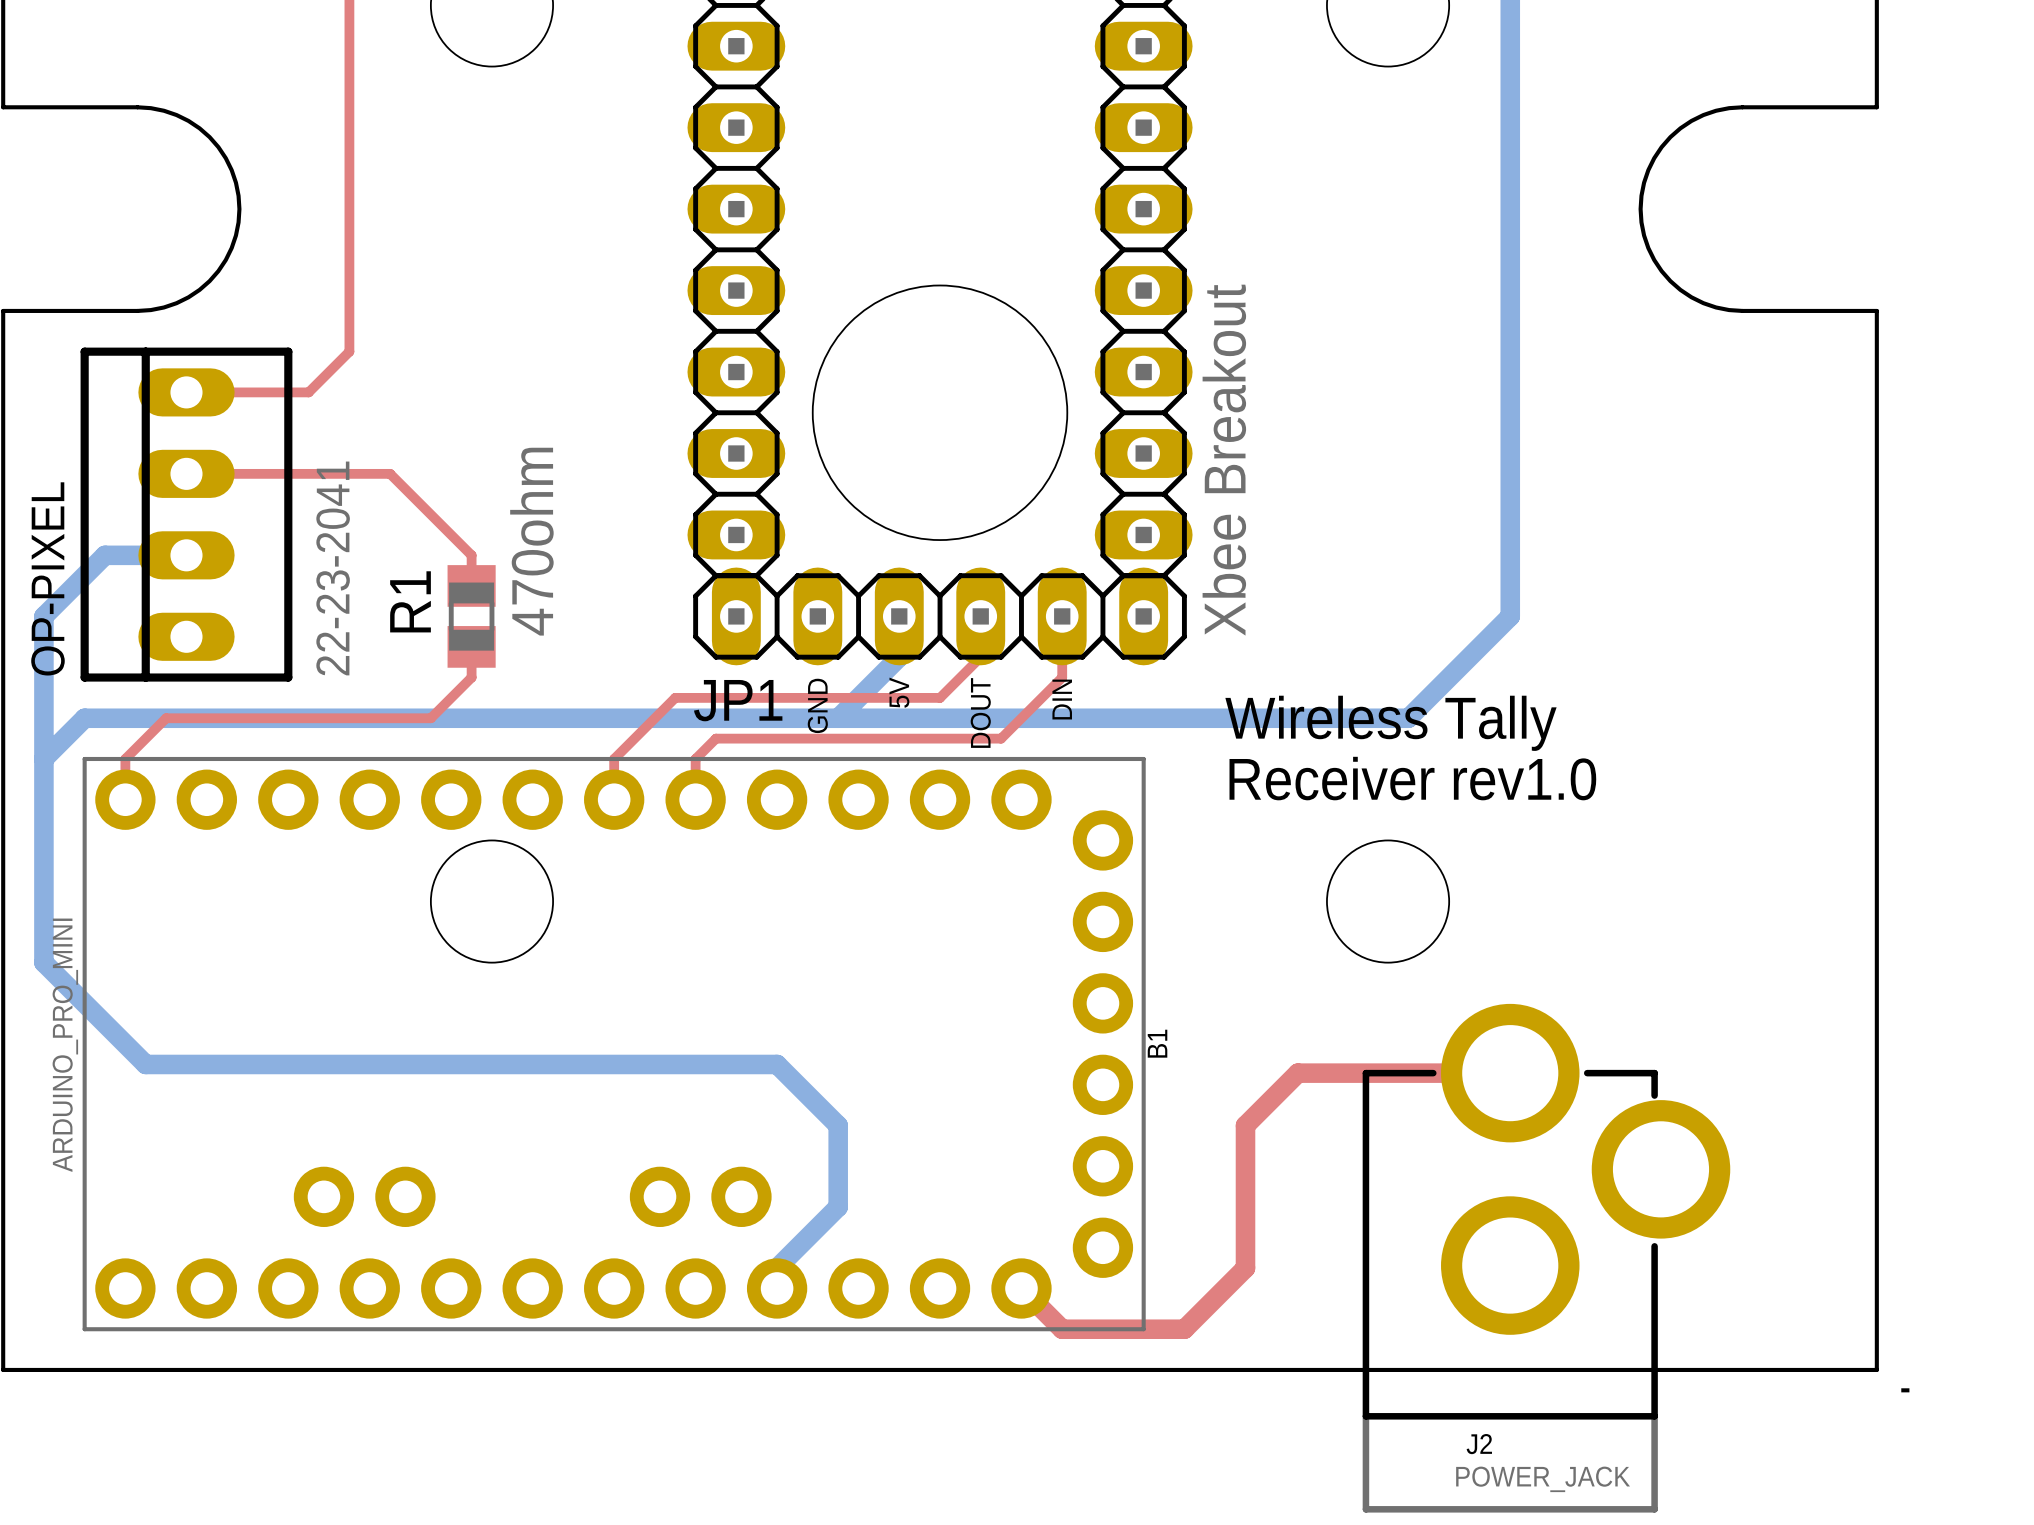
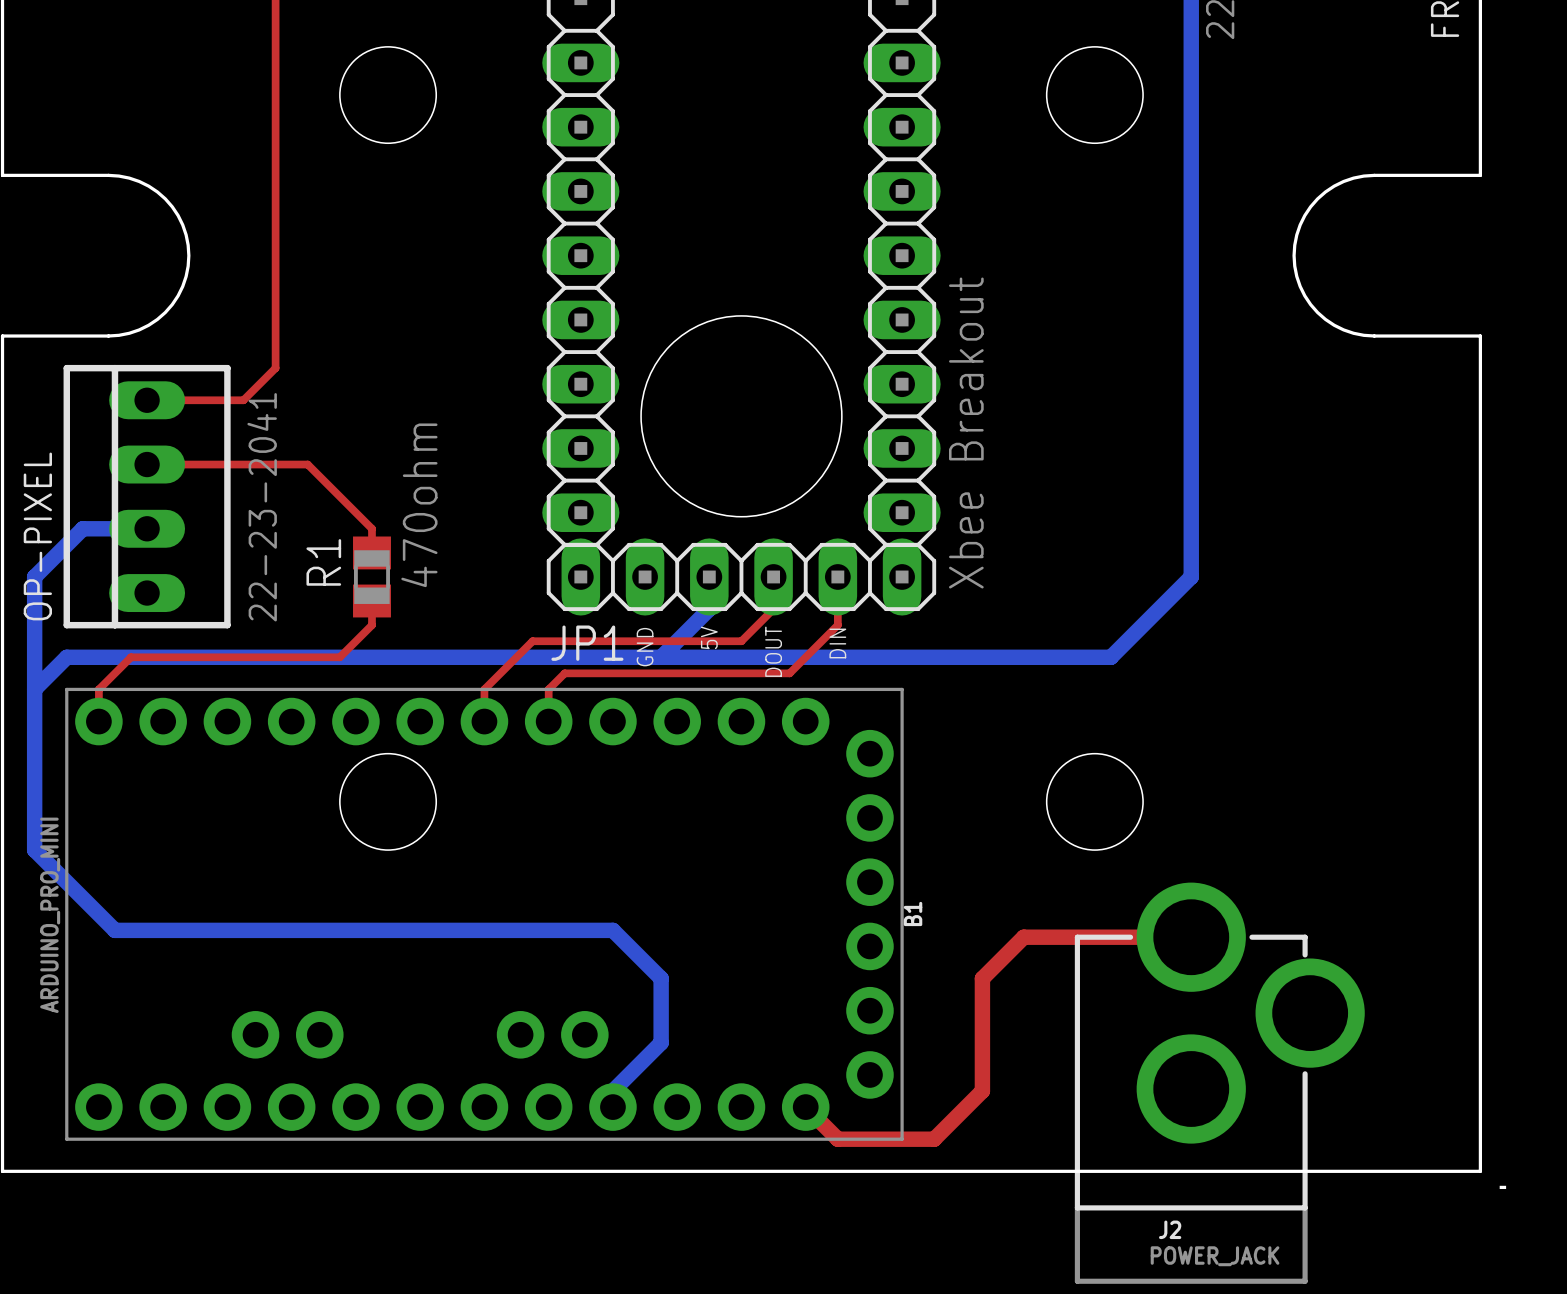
text: Wireless Tally (1390, 723) -> none
text: Receiver rev1.0 (1412, 778) -> none

